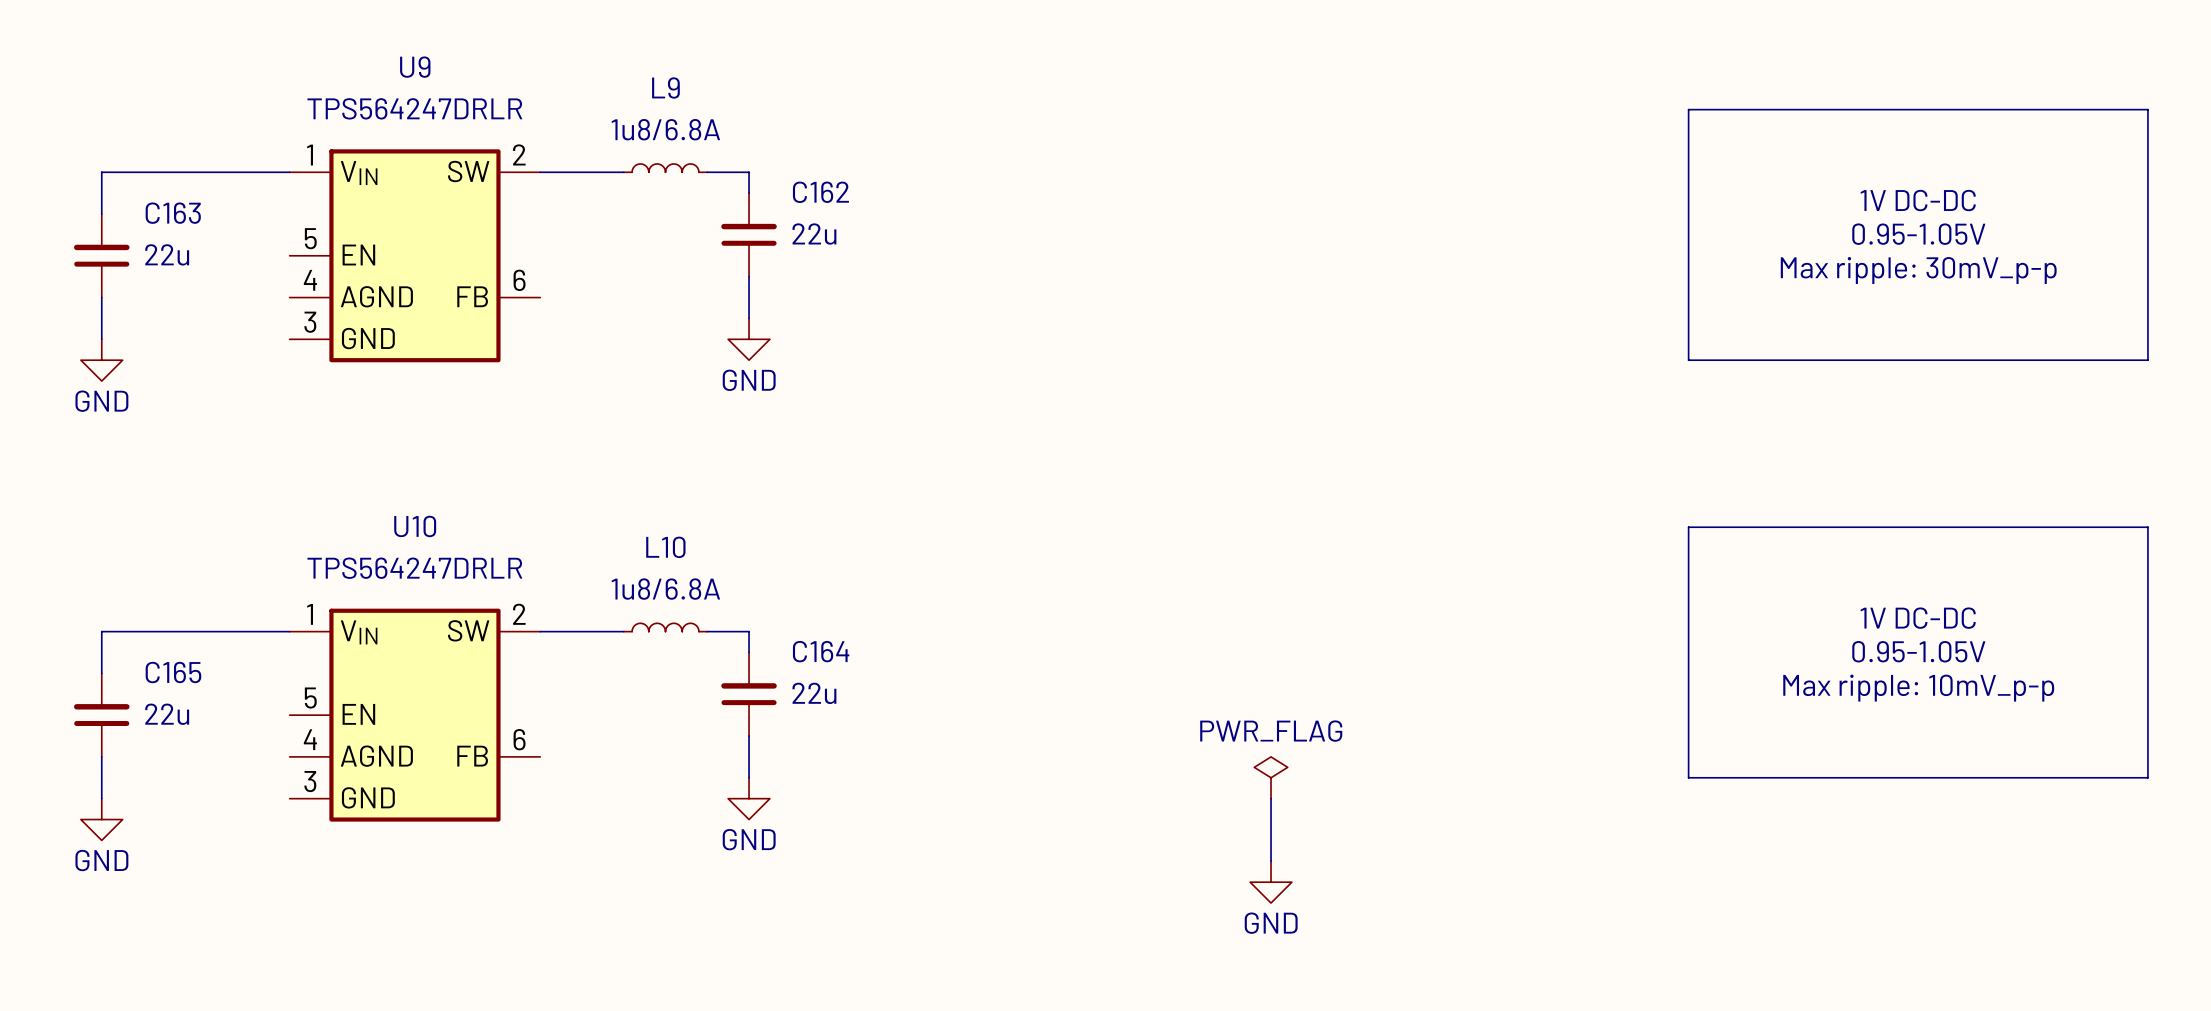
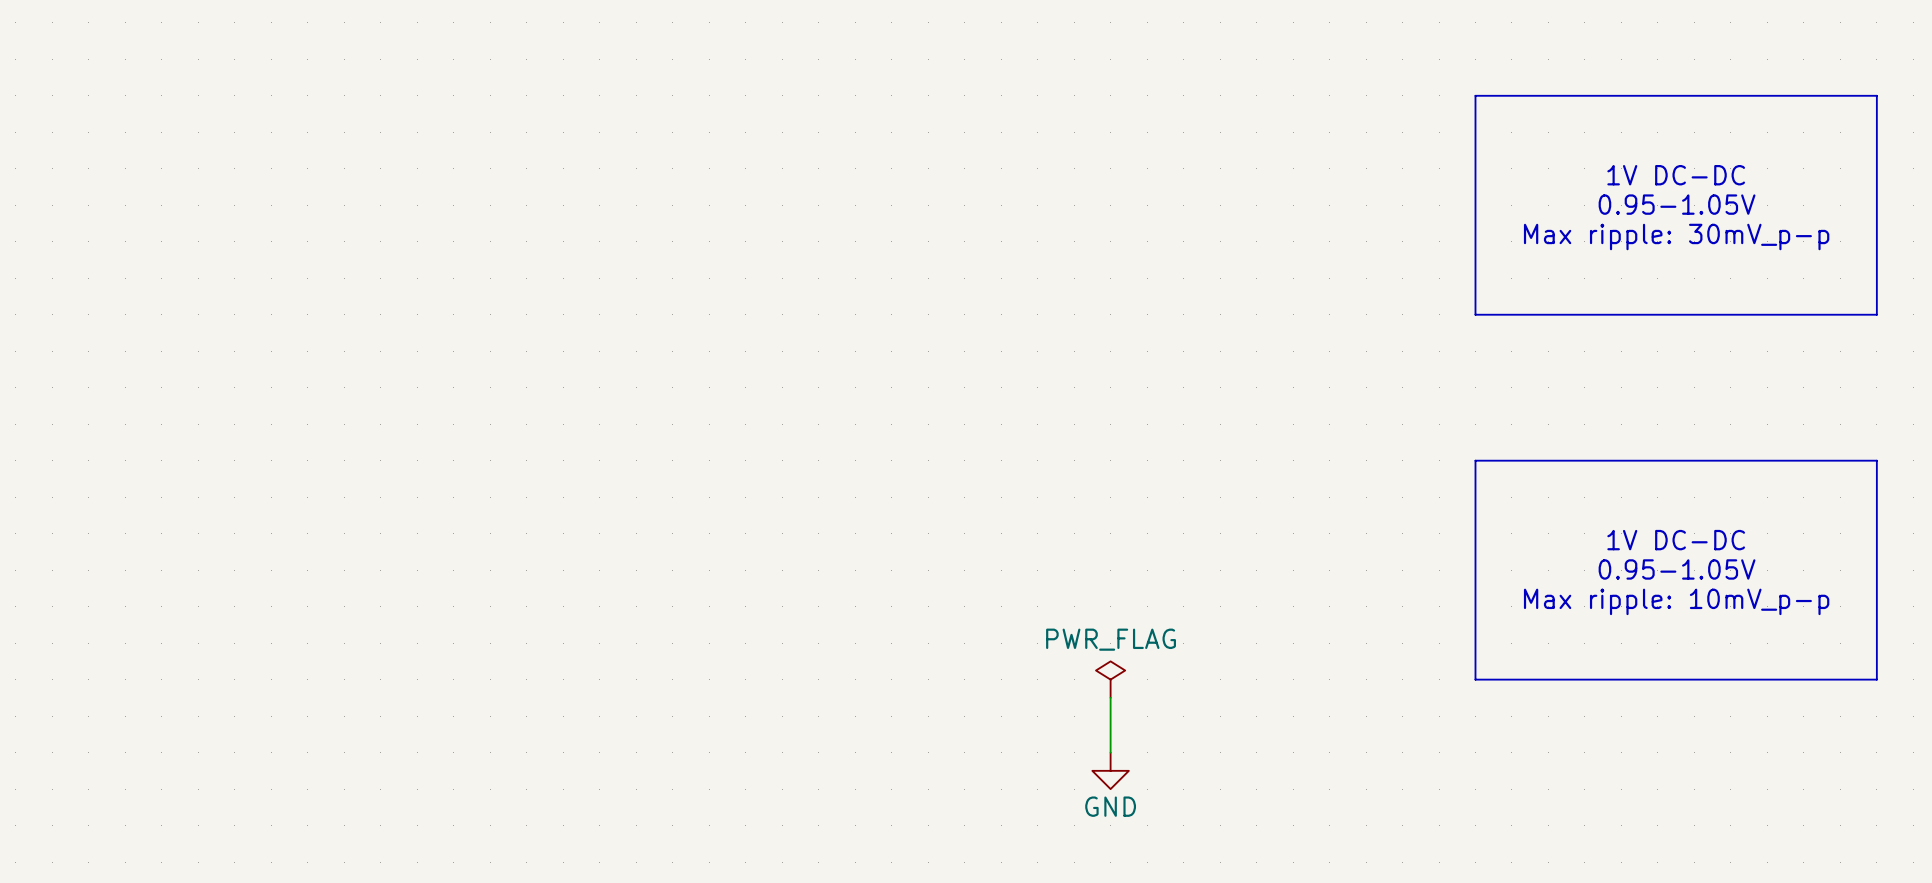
L9: (665, 168) -> none
wire: (289, 172) (101, 172) (101, 214) -> none
wire: (540, 172) (623, 172) -> none
wire: (707, 172) (749, 172) (749, 193) -> none
C162: (749, 234) -> none
C163: (101, 255) -> none
U9: (414, 255) -> none
wire: (749, 276) (749, 318) -> none
wire: (101, 297) (101, 339) -> none
power symbol: GND (749, 339) -> none
power symbol: GND (101, 360) -> none
L10: (665, 627) -> none
wire: (289, 631) (101, 631) (101, 673) -> none
wire: (540, 631) (623, 631) -> none
wire: (707, 631) (749, 631) (749, 652) -> none
C164: (749, 694) -> none
C165: (101, 715) -> none
U10: (414, 715) -> none
wire: (749, 736) (749, 777) -> none
wire: (101, 756) (101, 798) -> none
power symbol: GND (749, 798) -> none
power symbol: GND (101, 819) -> none

